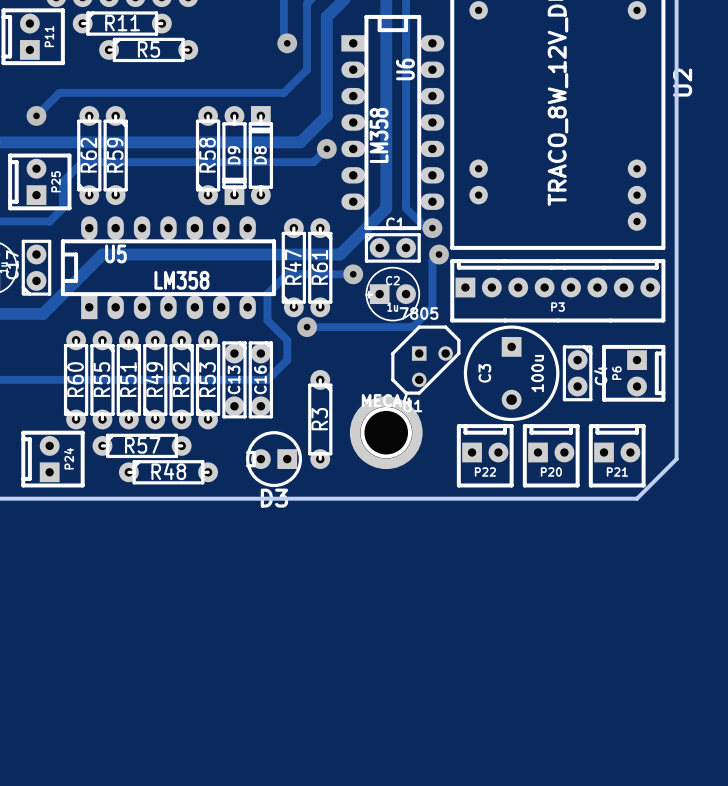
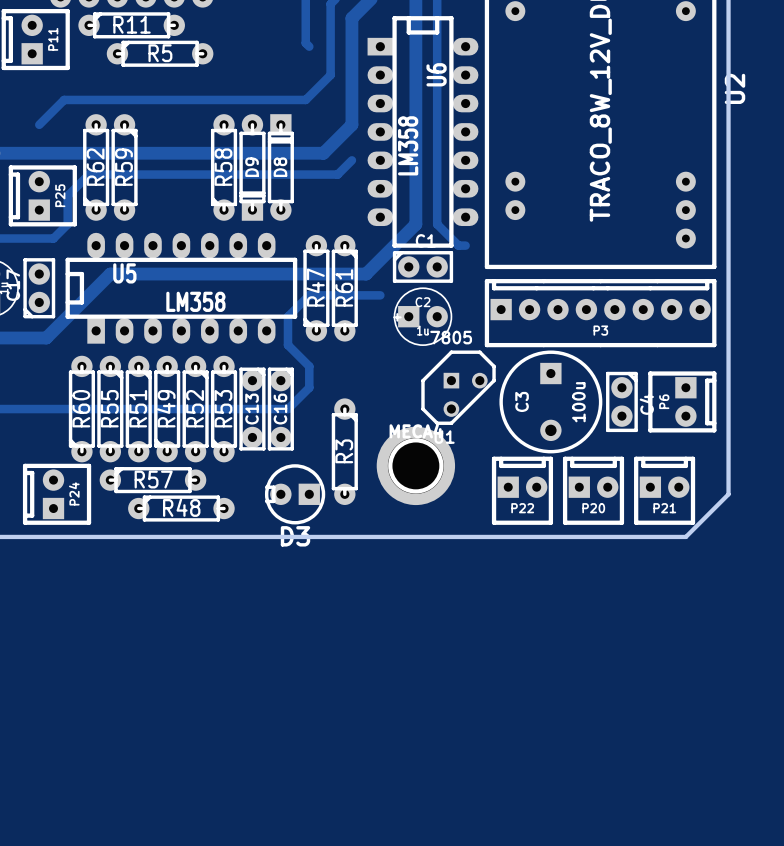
via: (287, 43) -> none
via: (36, 115) -> none
via: (326, 148) -> none
via: (432, 228) -> none
track: (439, 254) (432, 261) (432, 307) (412, 327) (307, 327) -> none
via: (439, 254) -> none
via: (353, 274) -> none
via: (307, 327) -> none

